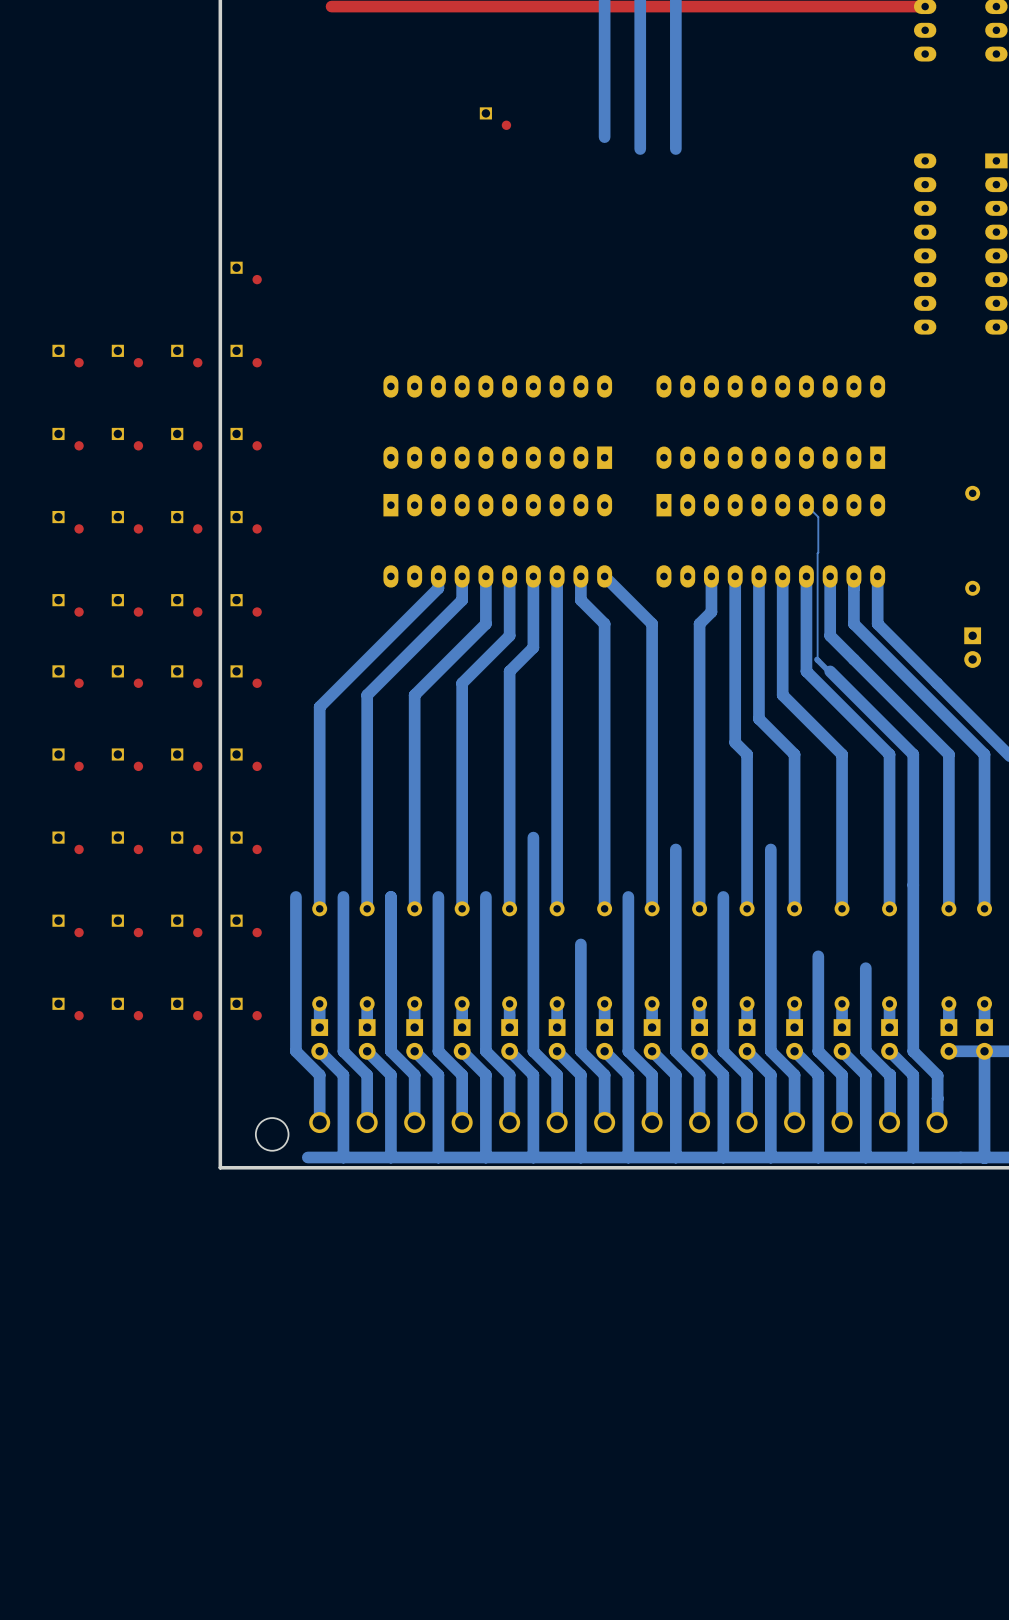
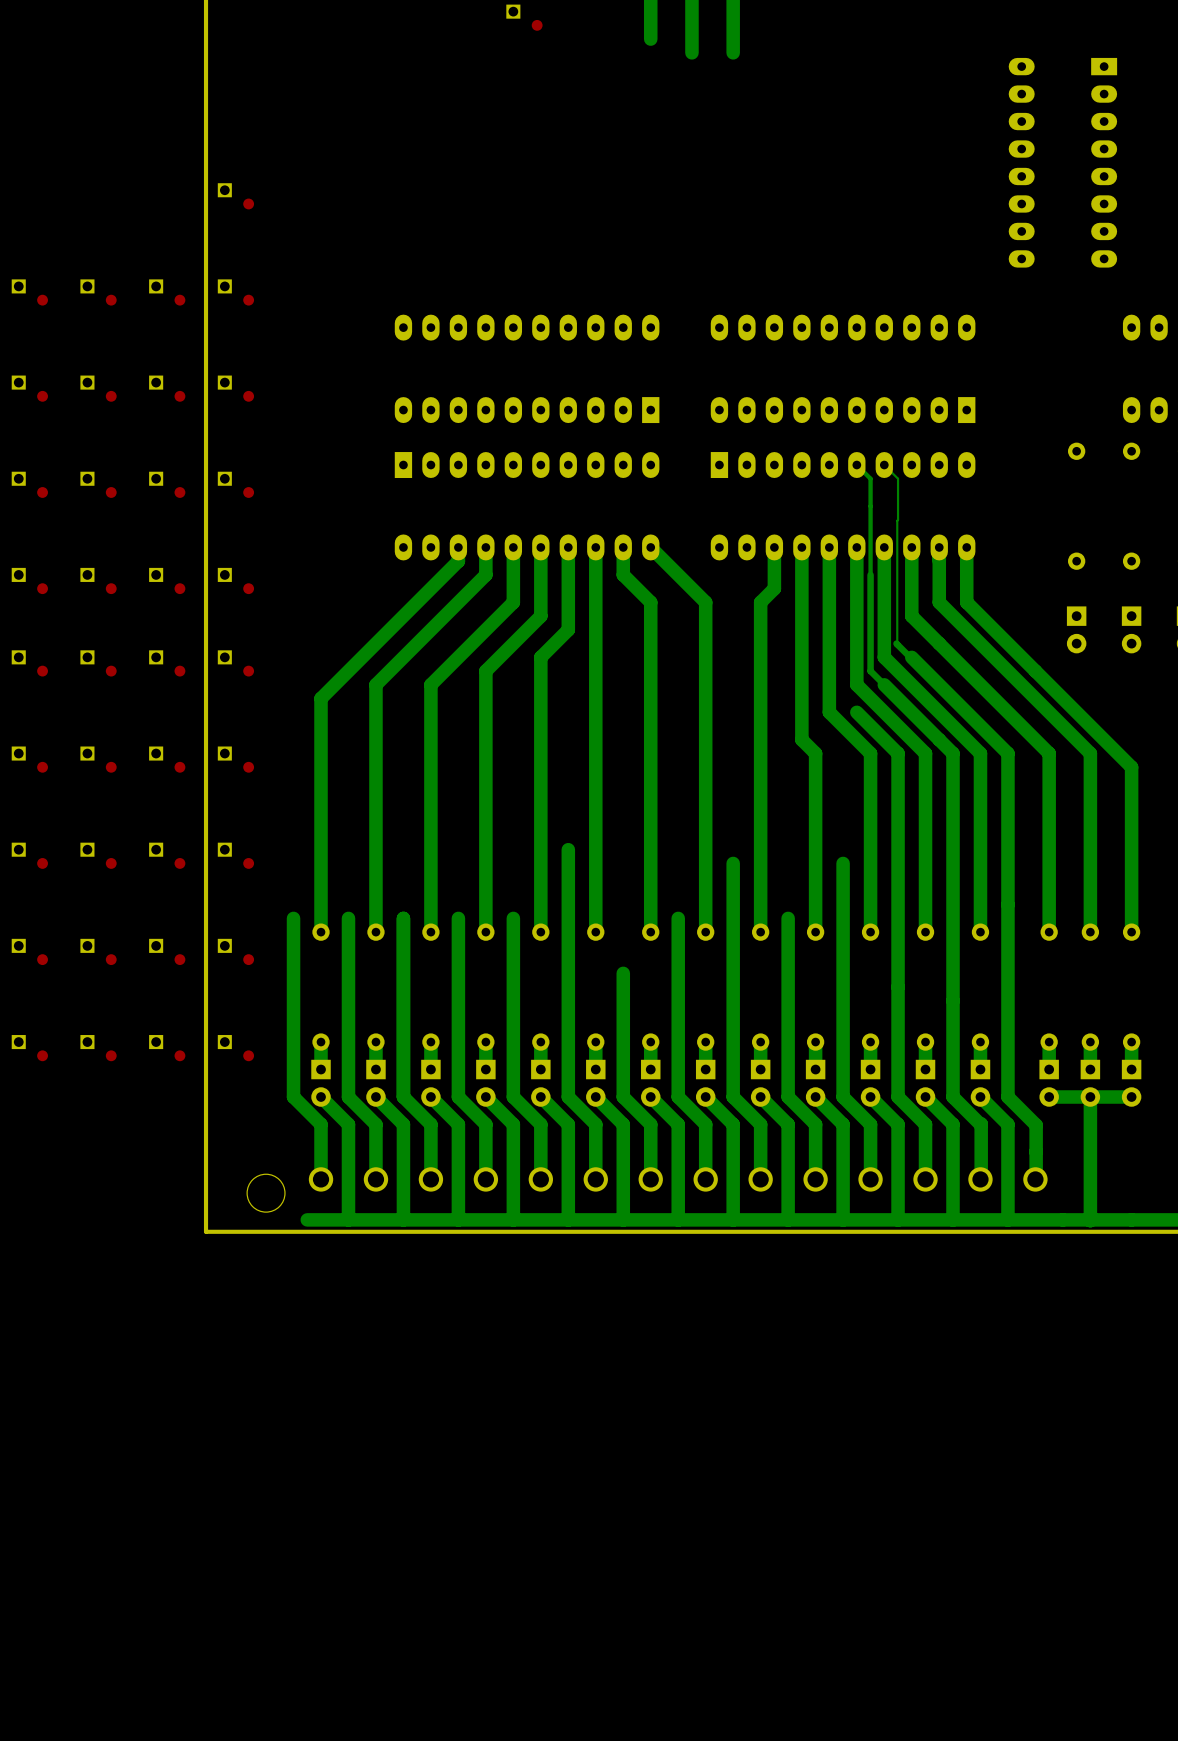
bottom track: none -> (856, 465) (870, 478) (870, 671) (953, 753) (953, 1000)
bottom track: none -> (856, 712) (898, 753) (898, 987)

